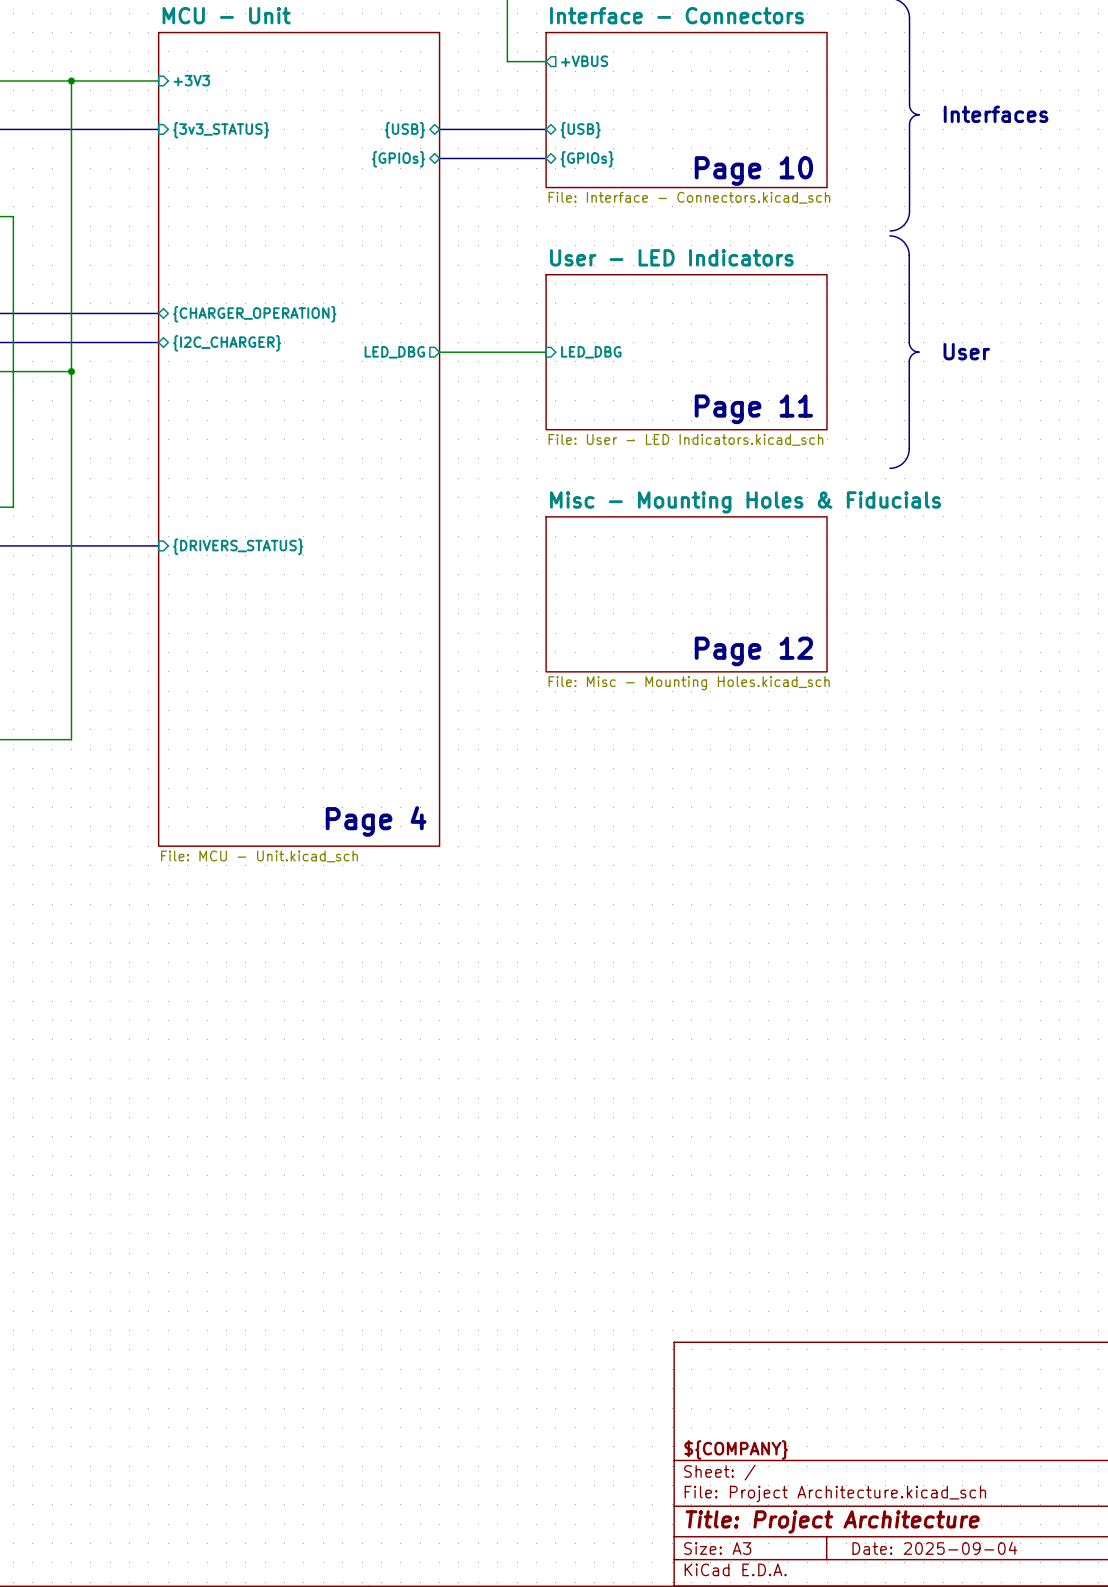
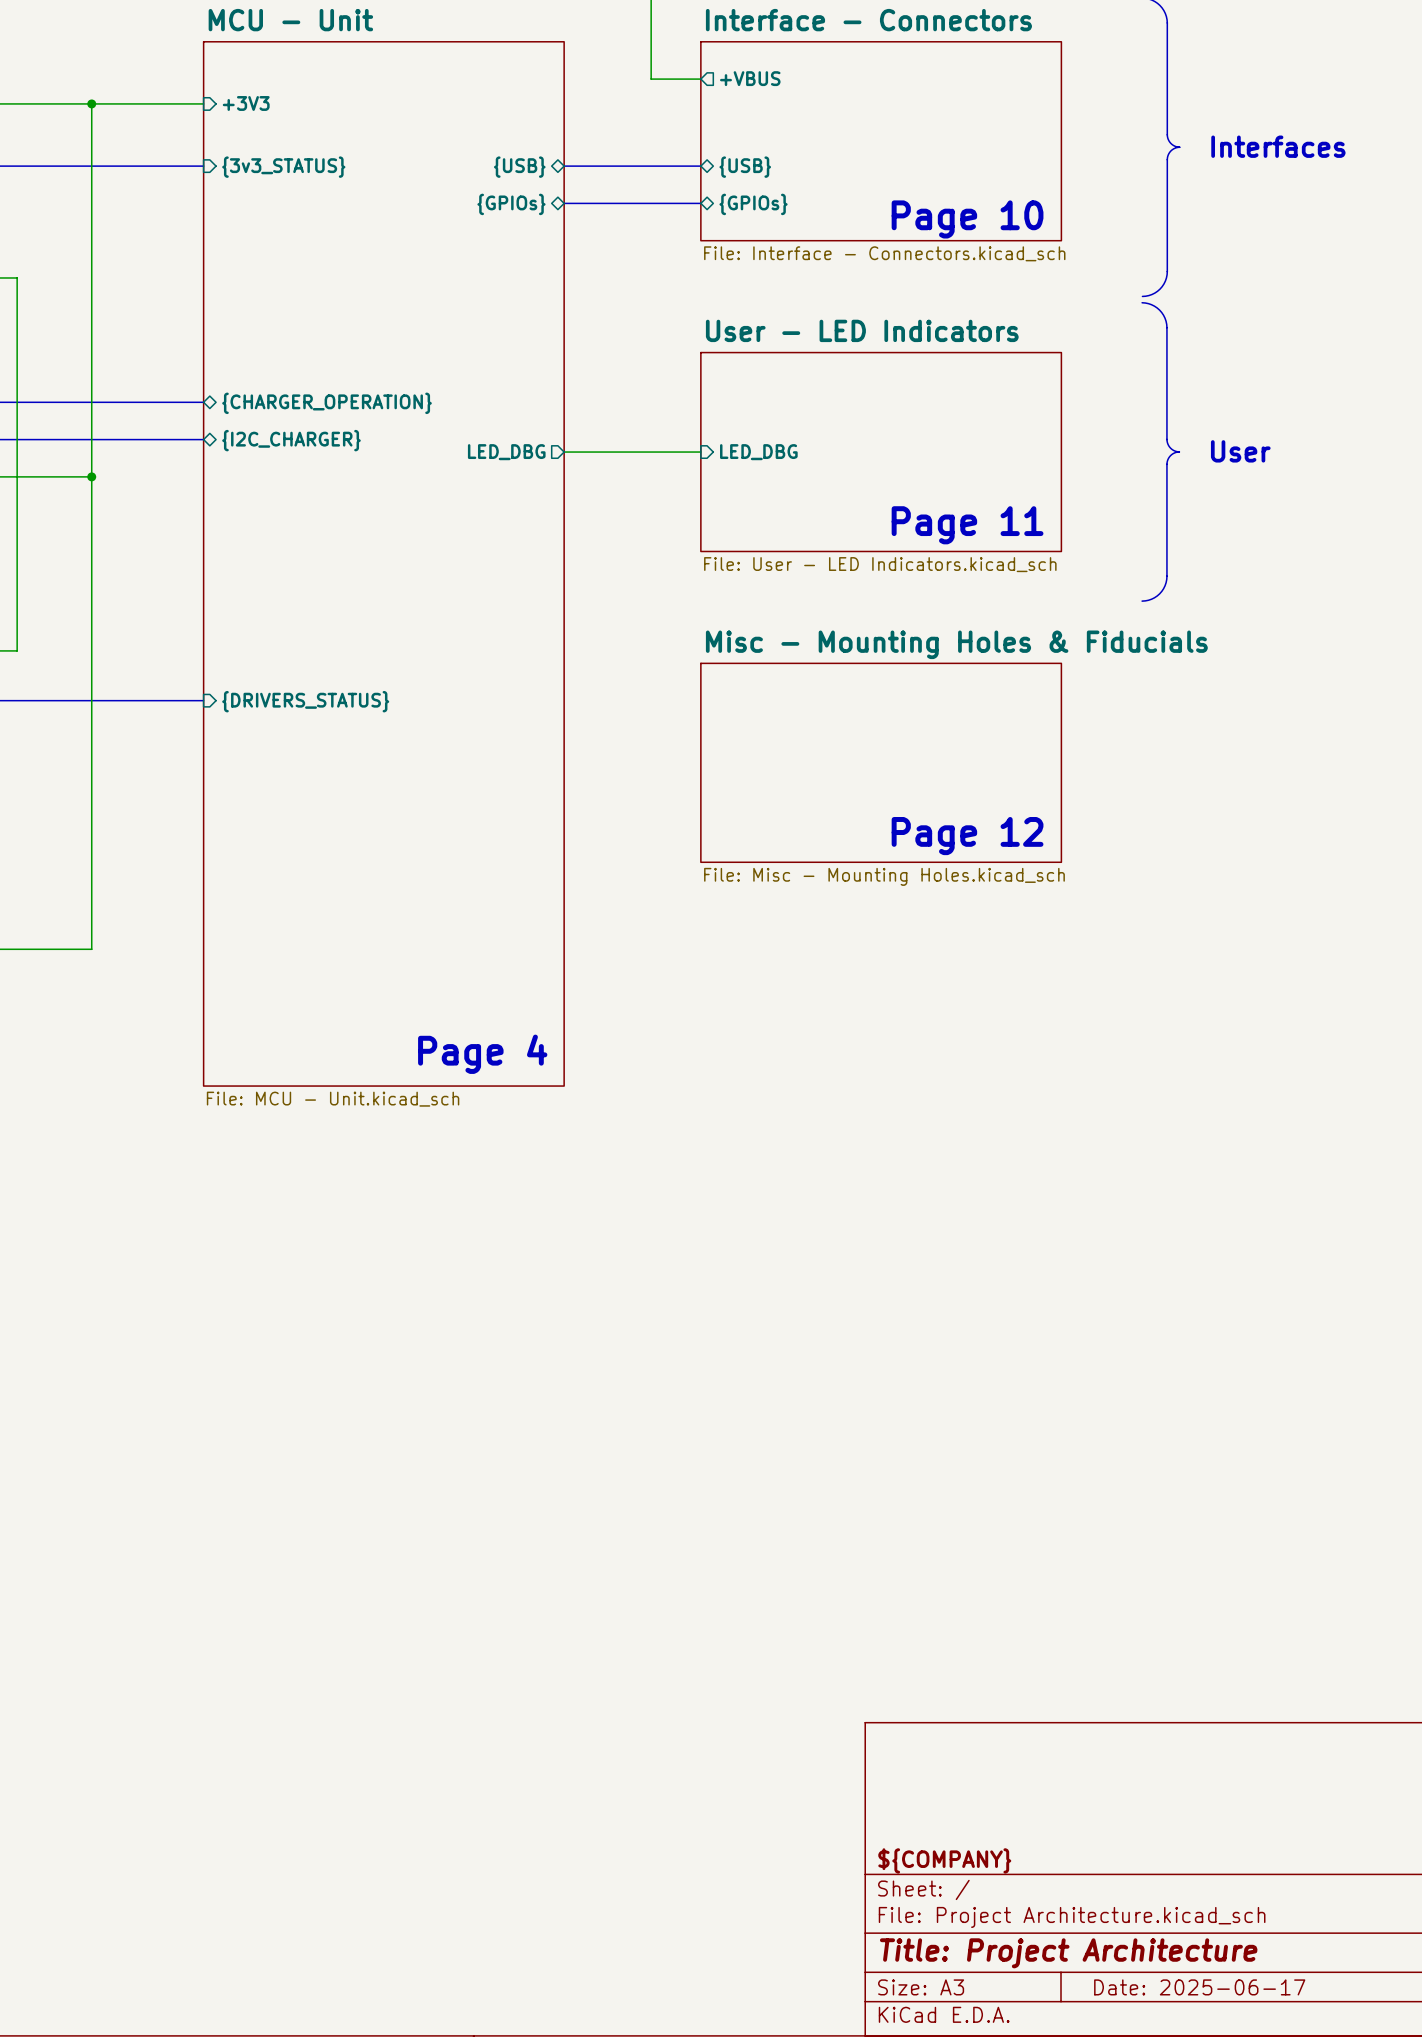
title block: Date: 2025-09-04 (934, 1548) -> Date: 2025-06-17 (1199, 1987)

